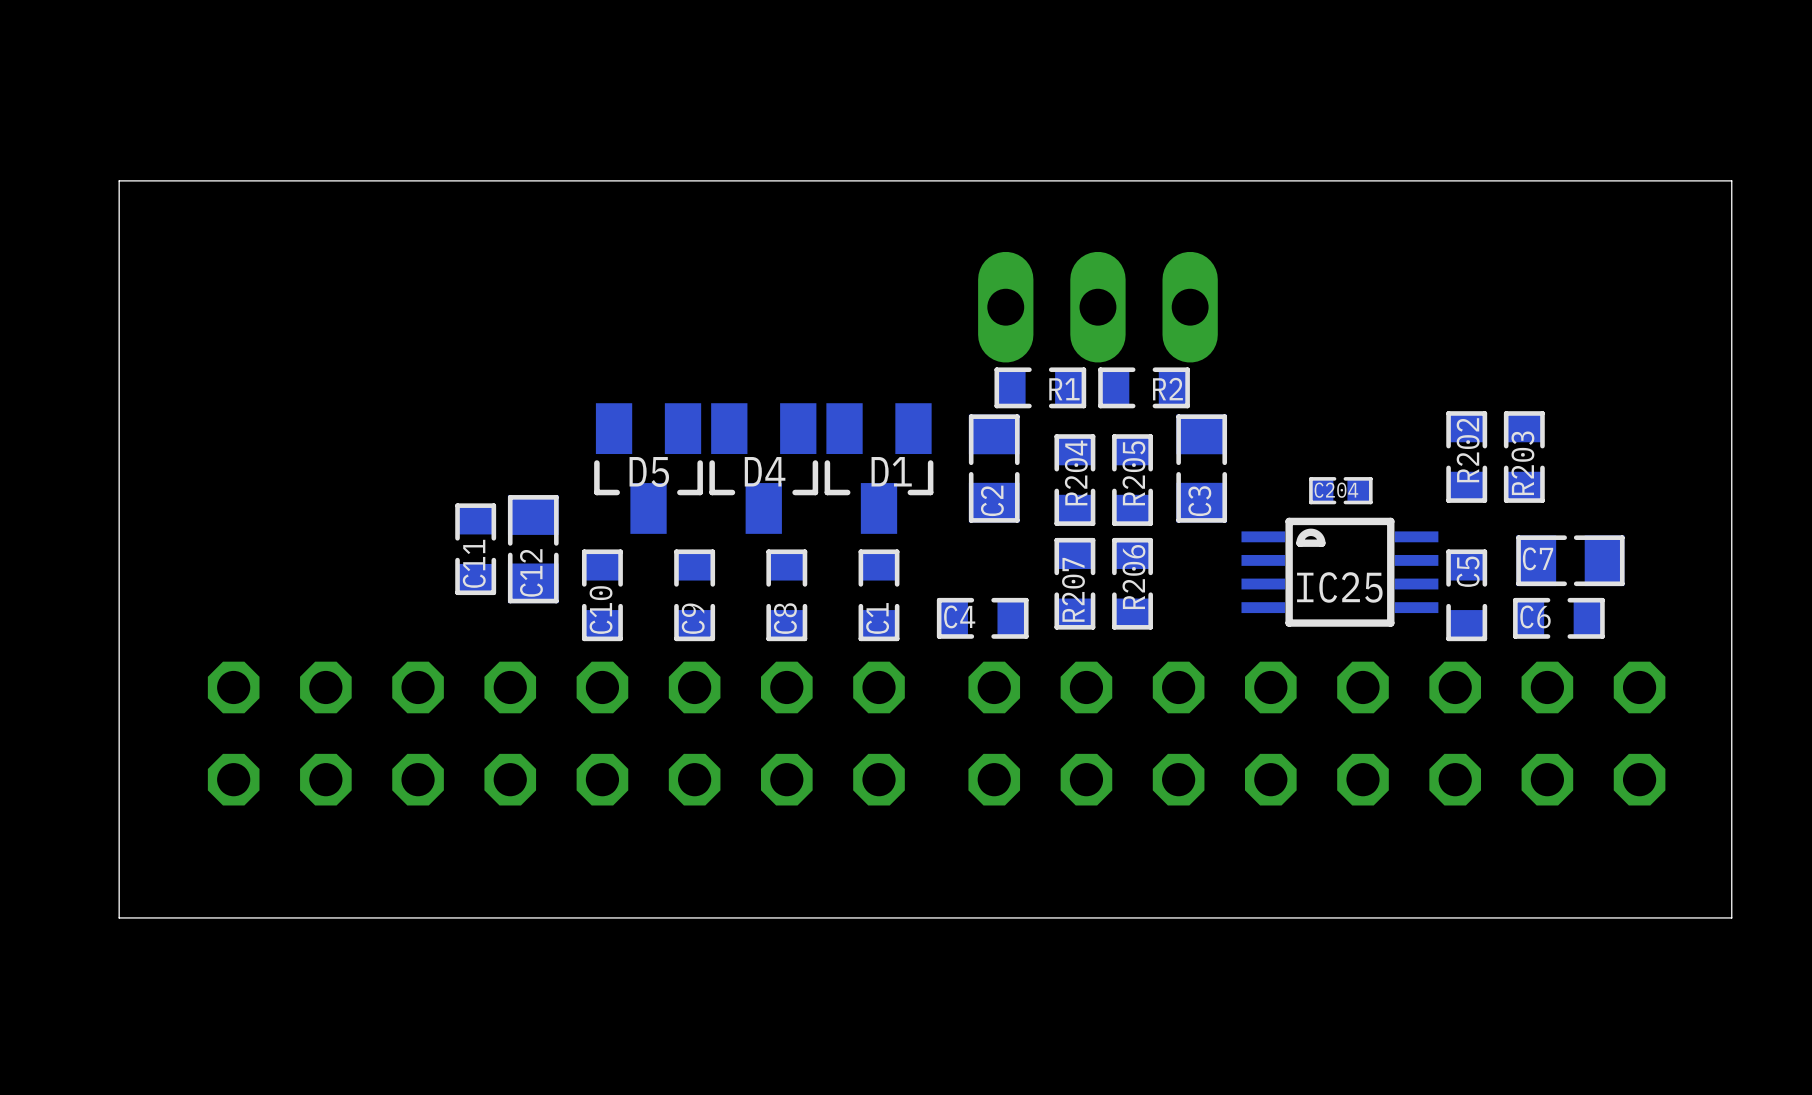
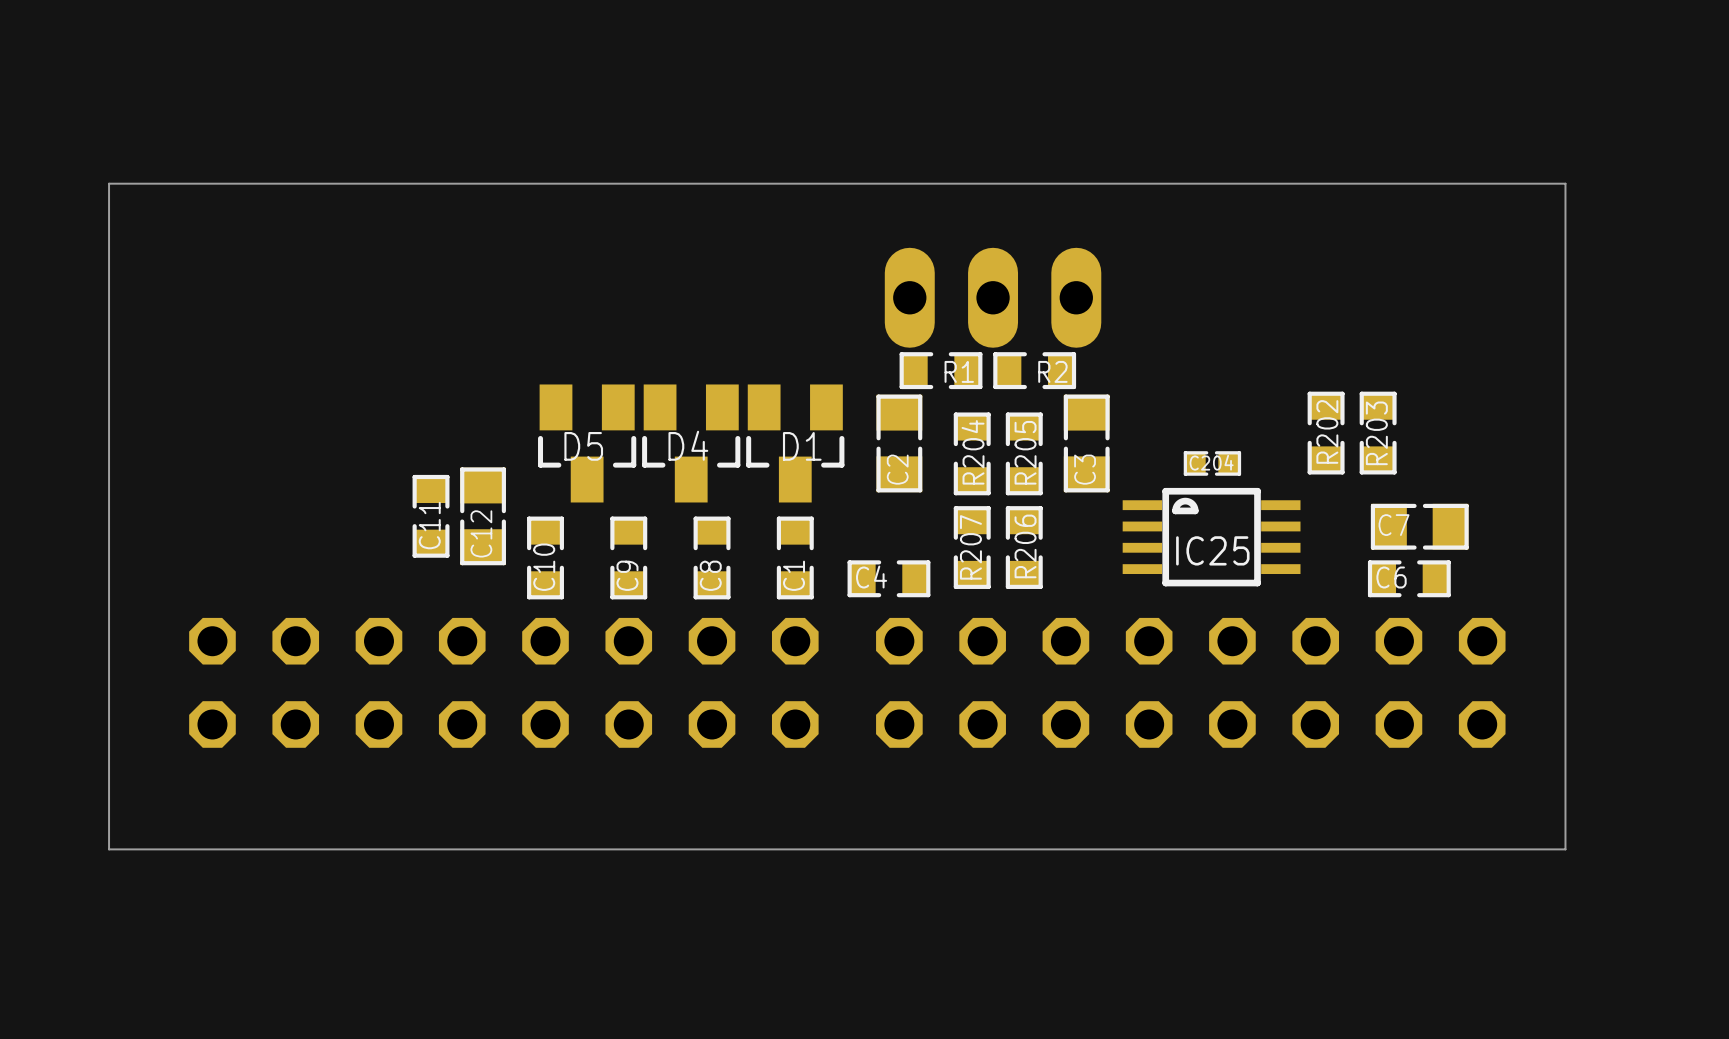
C5: (1466, 595) -> none

